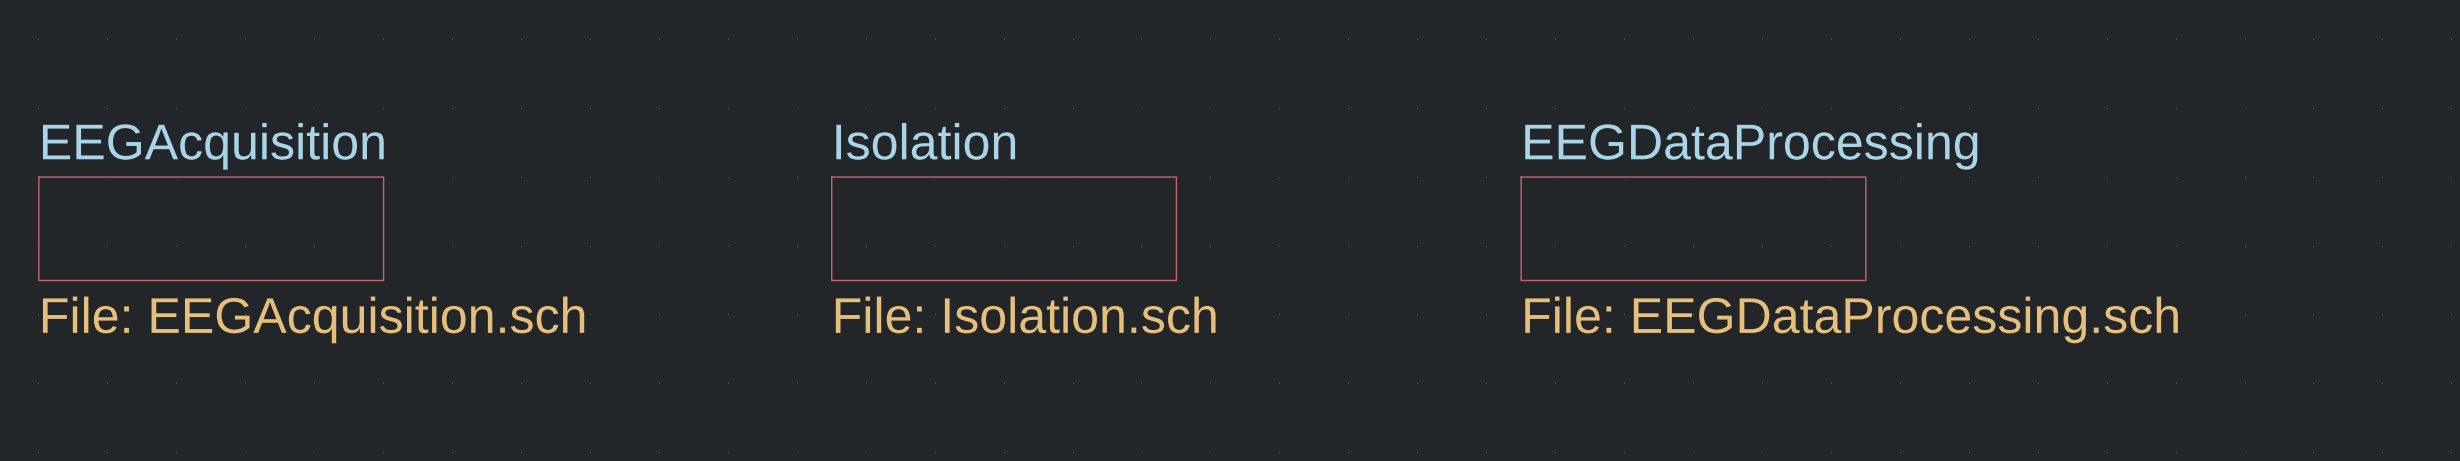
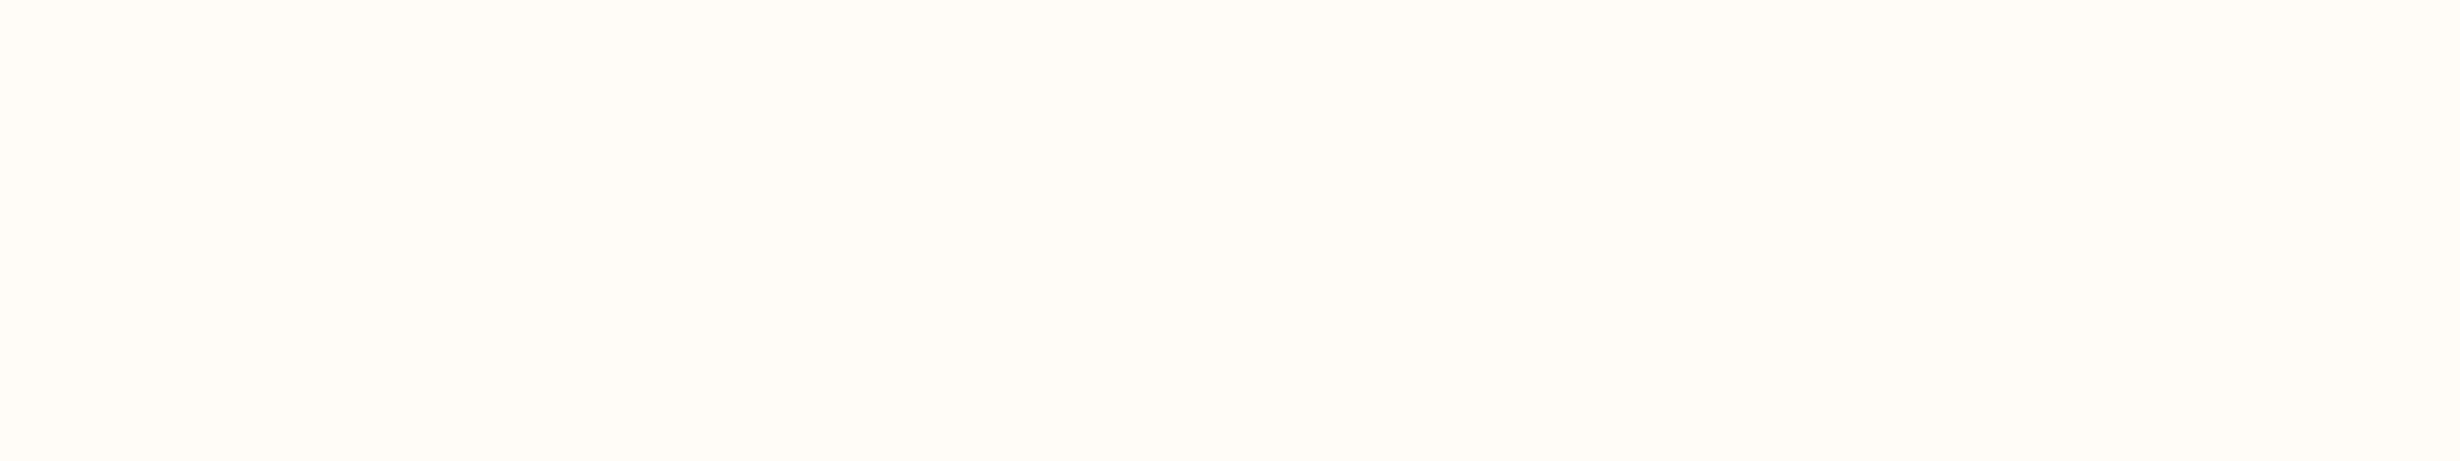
sheet EEGAcquisition: File: EEGAcquisition.sch (211, 228) -> none
sheet Isolation: File: Isolation.sch (1004, 228) -> none
sheet EEGDataProcessing: File: EEGDataProcessing.sch (1693, 228) -> none

